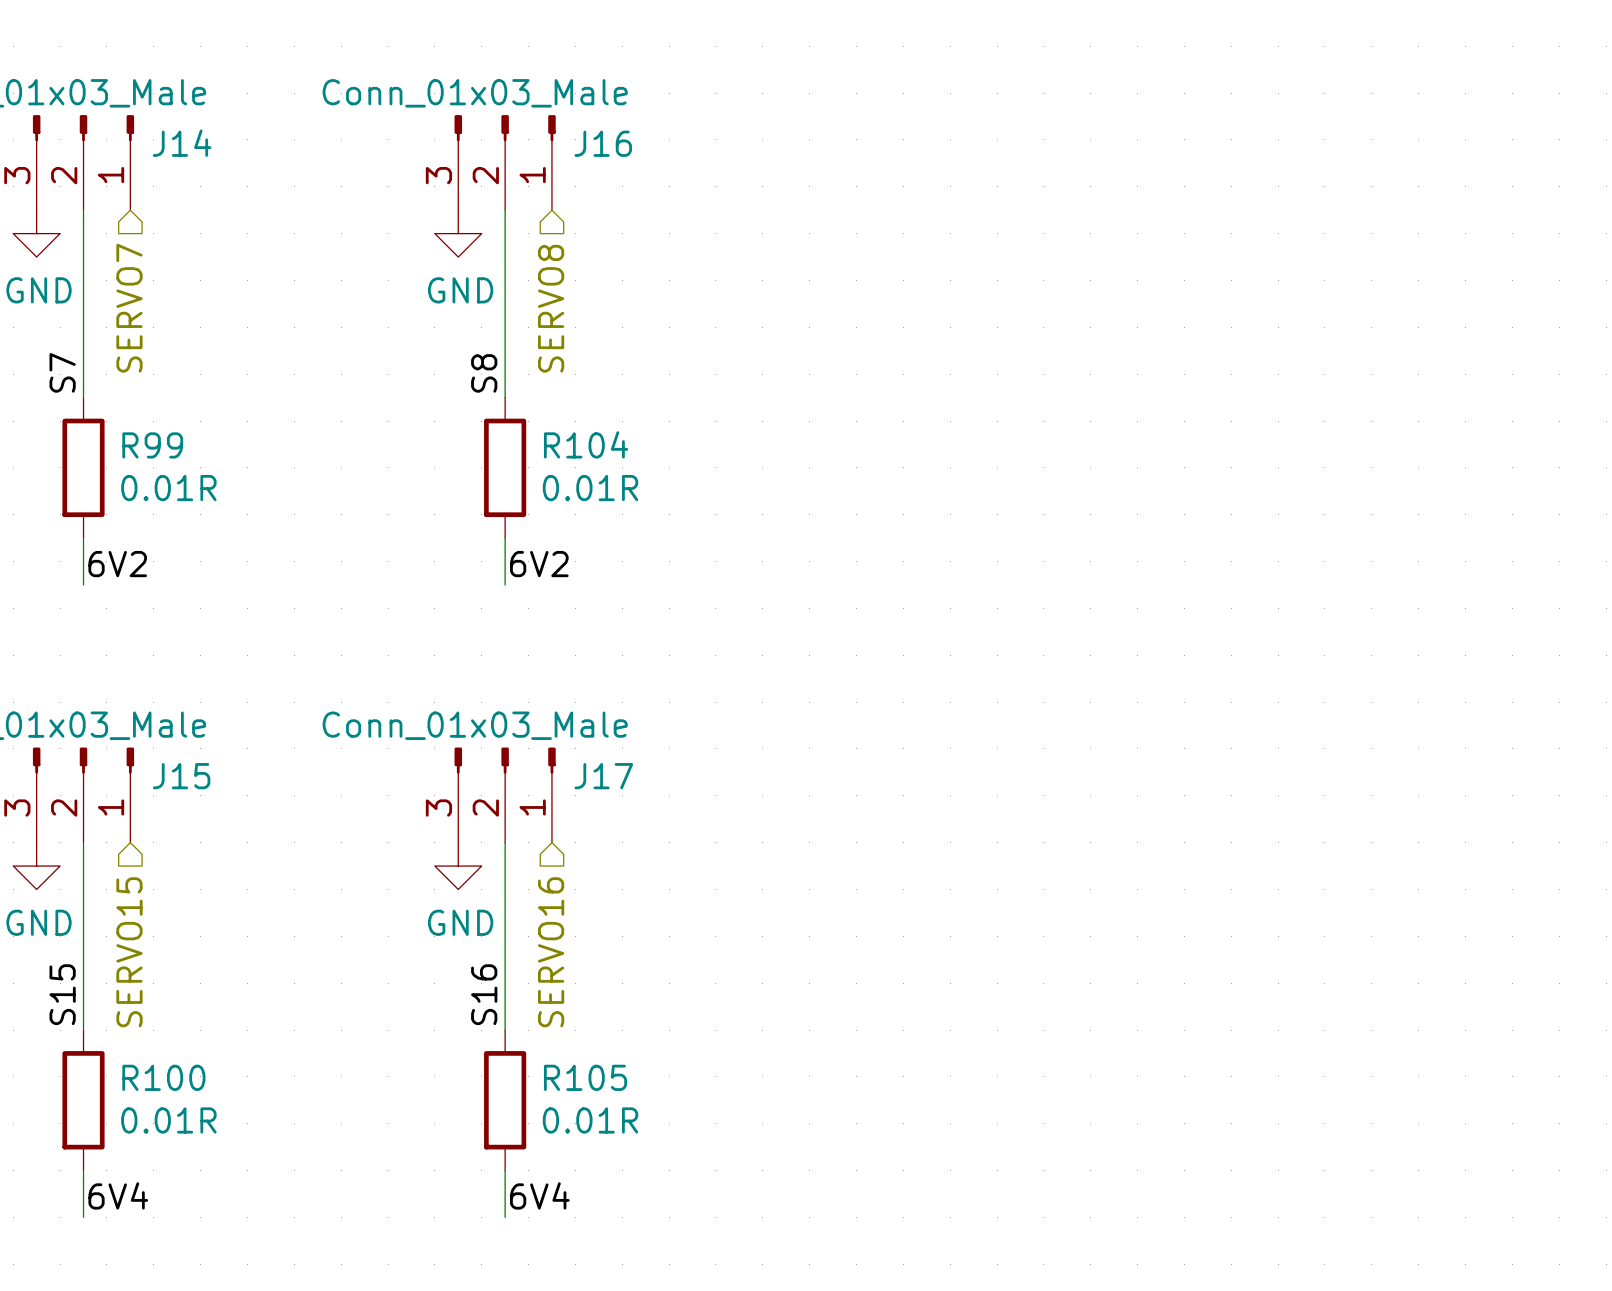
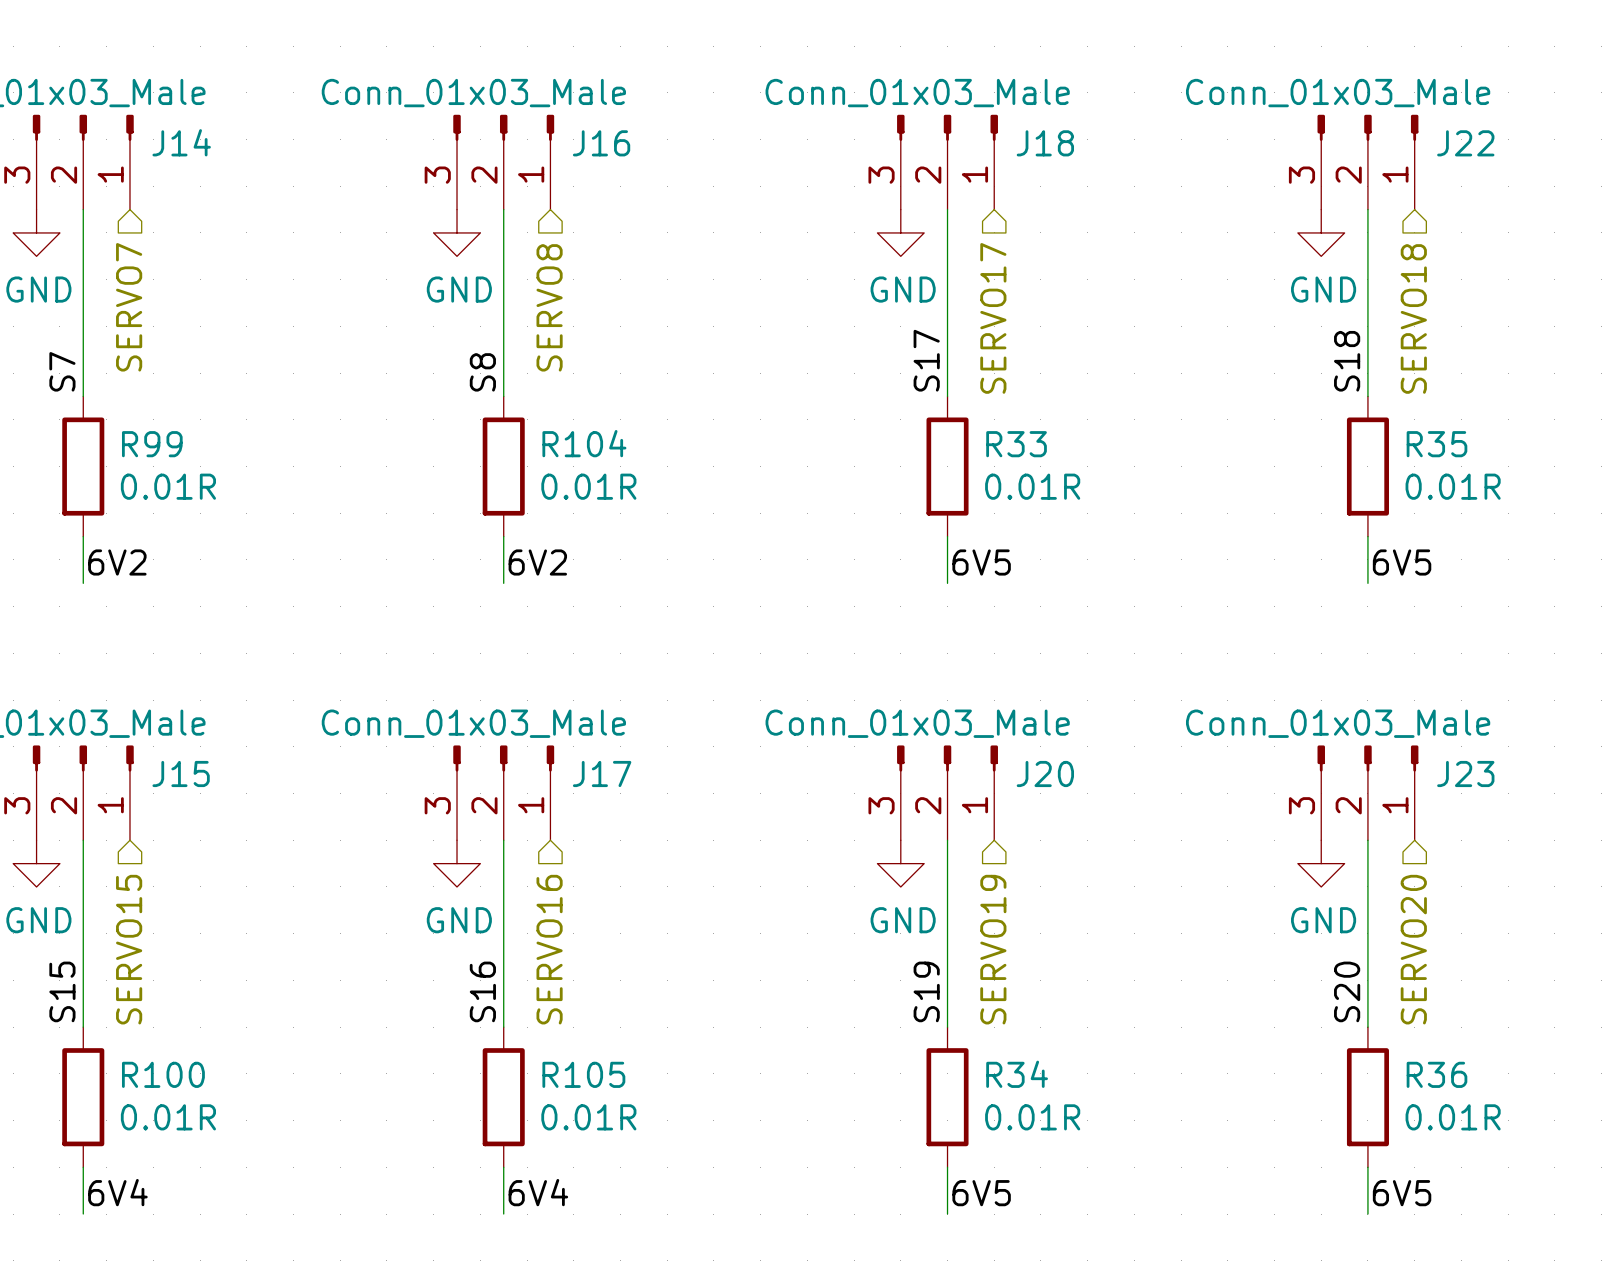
J18: none -> Conn_01x03_Male (947, 162)
J22: none -> Conn_01x03_Male (1367, 162)
wire: none -> (947, 209) (947, 396)
wire: none -> (1367, 209) (1367, 396)
power symbol: none -> GND (900, 232)
power symbol: none -> GND (1321, 232)
hierarchical label: none -> SERVO17 (993, 318)
hierarchical label: none -> SERVO18 (1413, 318)
label: none -> S17 (926, 360)
label: none -> S18 (1347, 361)
R33: none -> 0.01R (947, 466)
R35: none -> 0.01R (1367, 466)
wire: none -> (947, 536) (947, 583)
wire: none -> (1367, 536) (1367, 583)
label: none -> 6V5 (981, 562)
label: none -> 6V5 (1402, 562)
J20: none -> Conn_01x03_Male (947, 792)
J23: none -> Conn_01x03_Male (1367, 792)
wire: none -> (947, 840) (947, 1027)
wire: none -> (1367, 840) (1367, 1027)
power symbol: none -> GND (900, 863)
power symbol: none -> GND (1321, 863)
hierarchical label: none -> SERVO19 (993, 949)
hierarchical label: none -> SERVO20 (1413, 949)
label: none -> S19 (926, 991)
label: none -> S20 (1347, 991)
R34: none -> 0.01R (947, 1097)
R36: none -> 0.01R (1367, 1097)
wire: none -> (947, 1167) (947, 1214)
wire: none -> (1367, 1167) (1367, 1214)
label: none -> 6V5 (981, 1193)
label: none -> 6V5 (1402, 1193)

